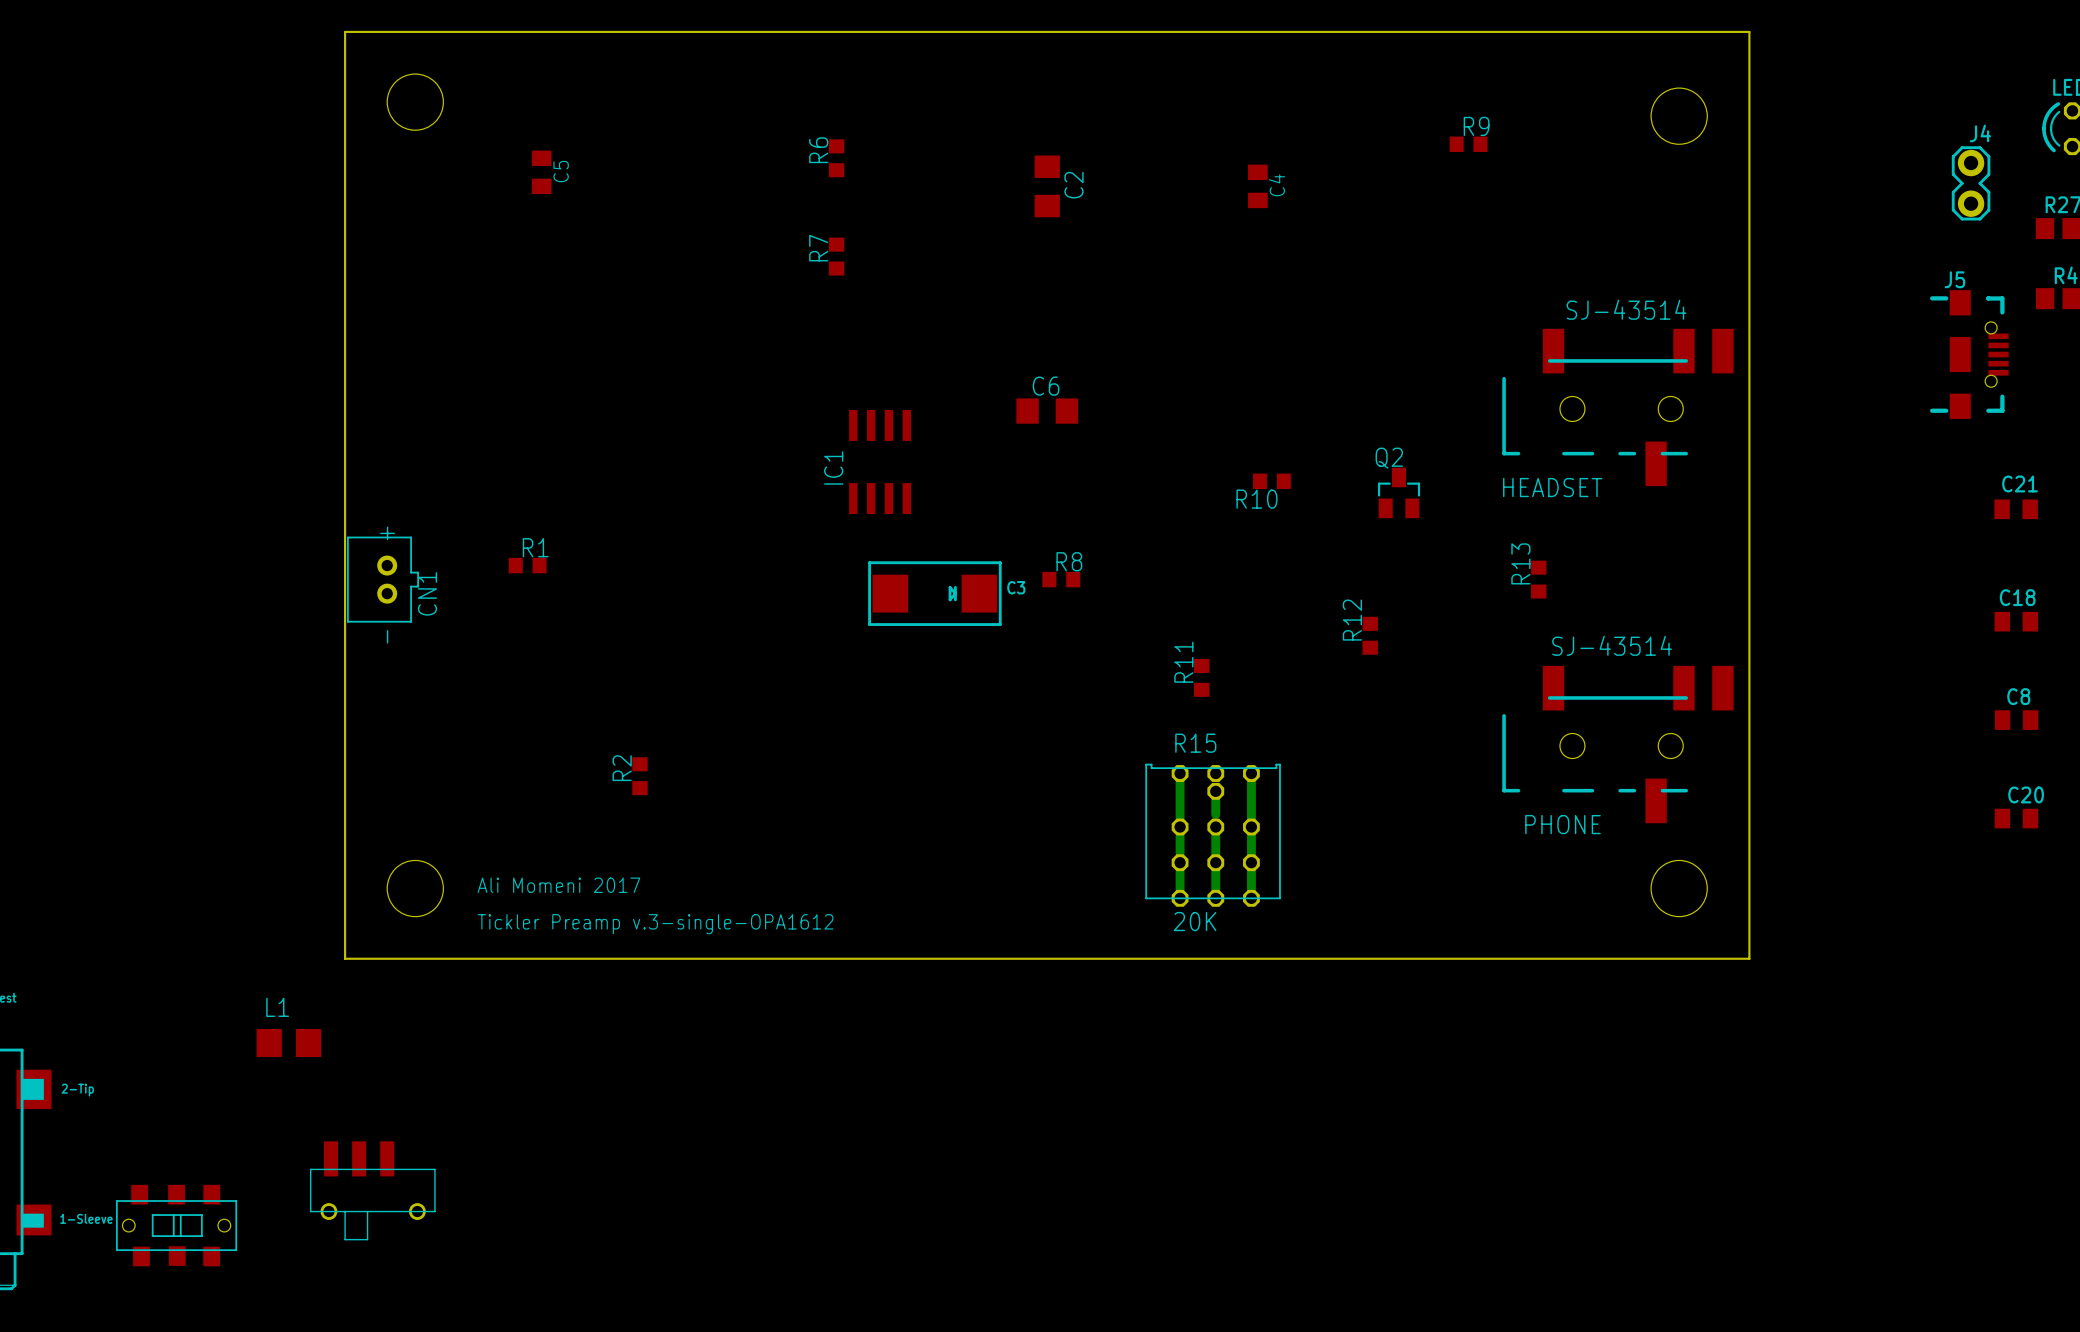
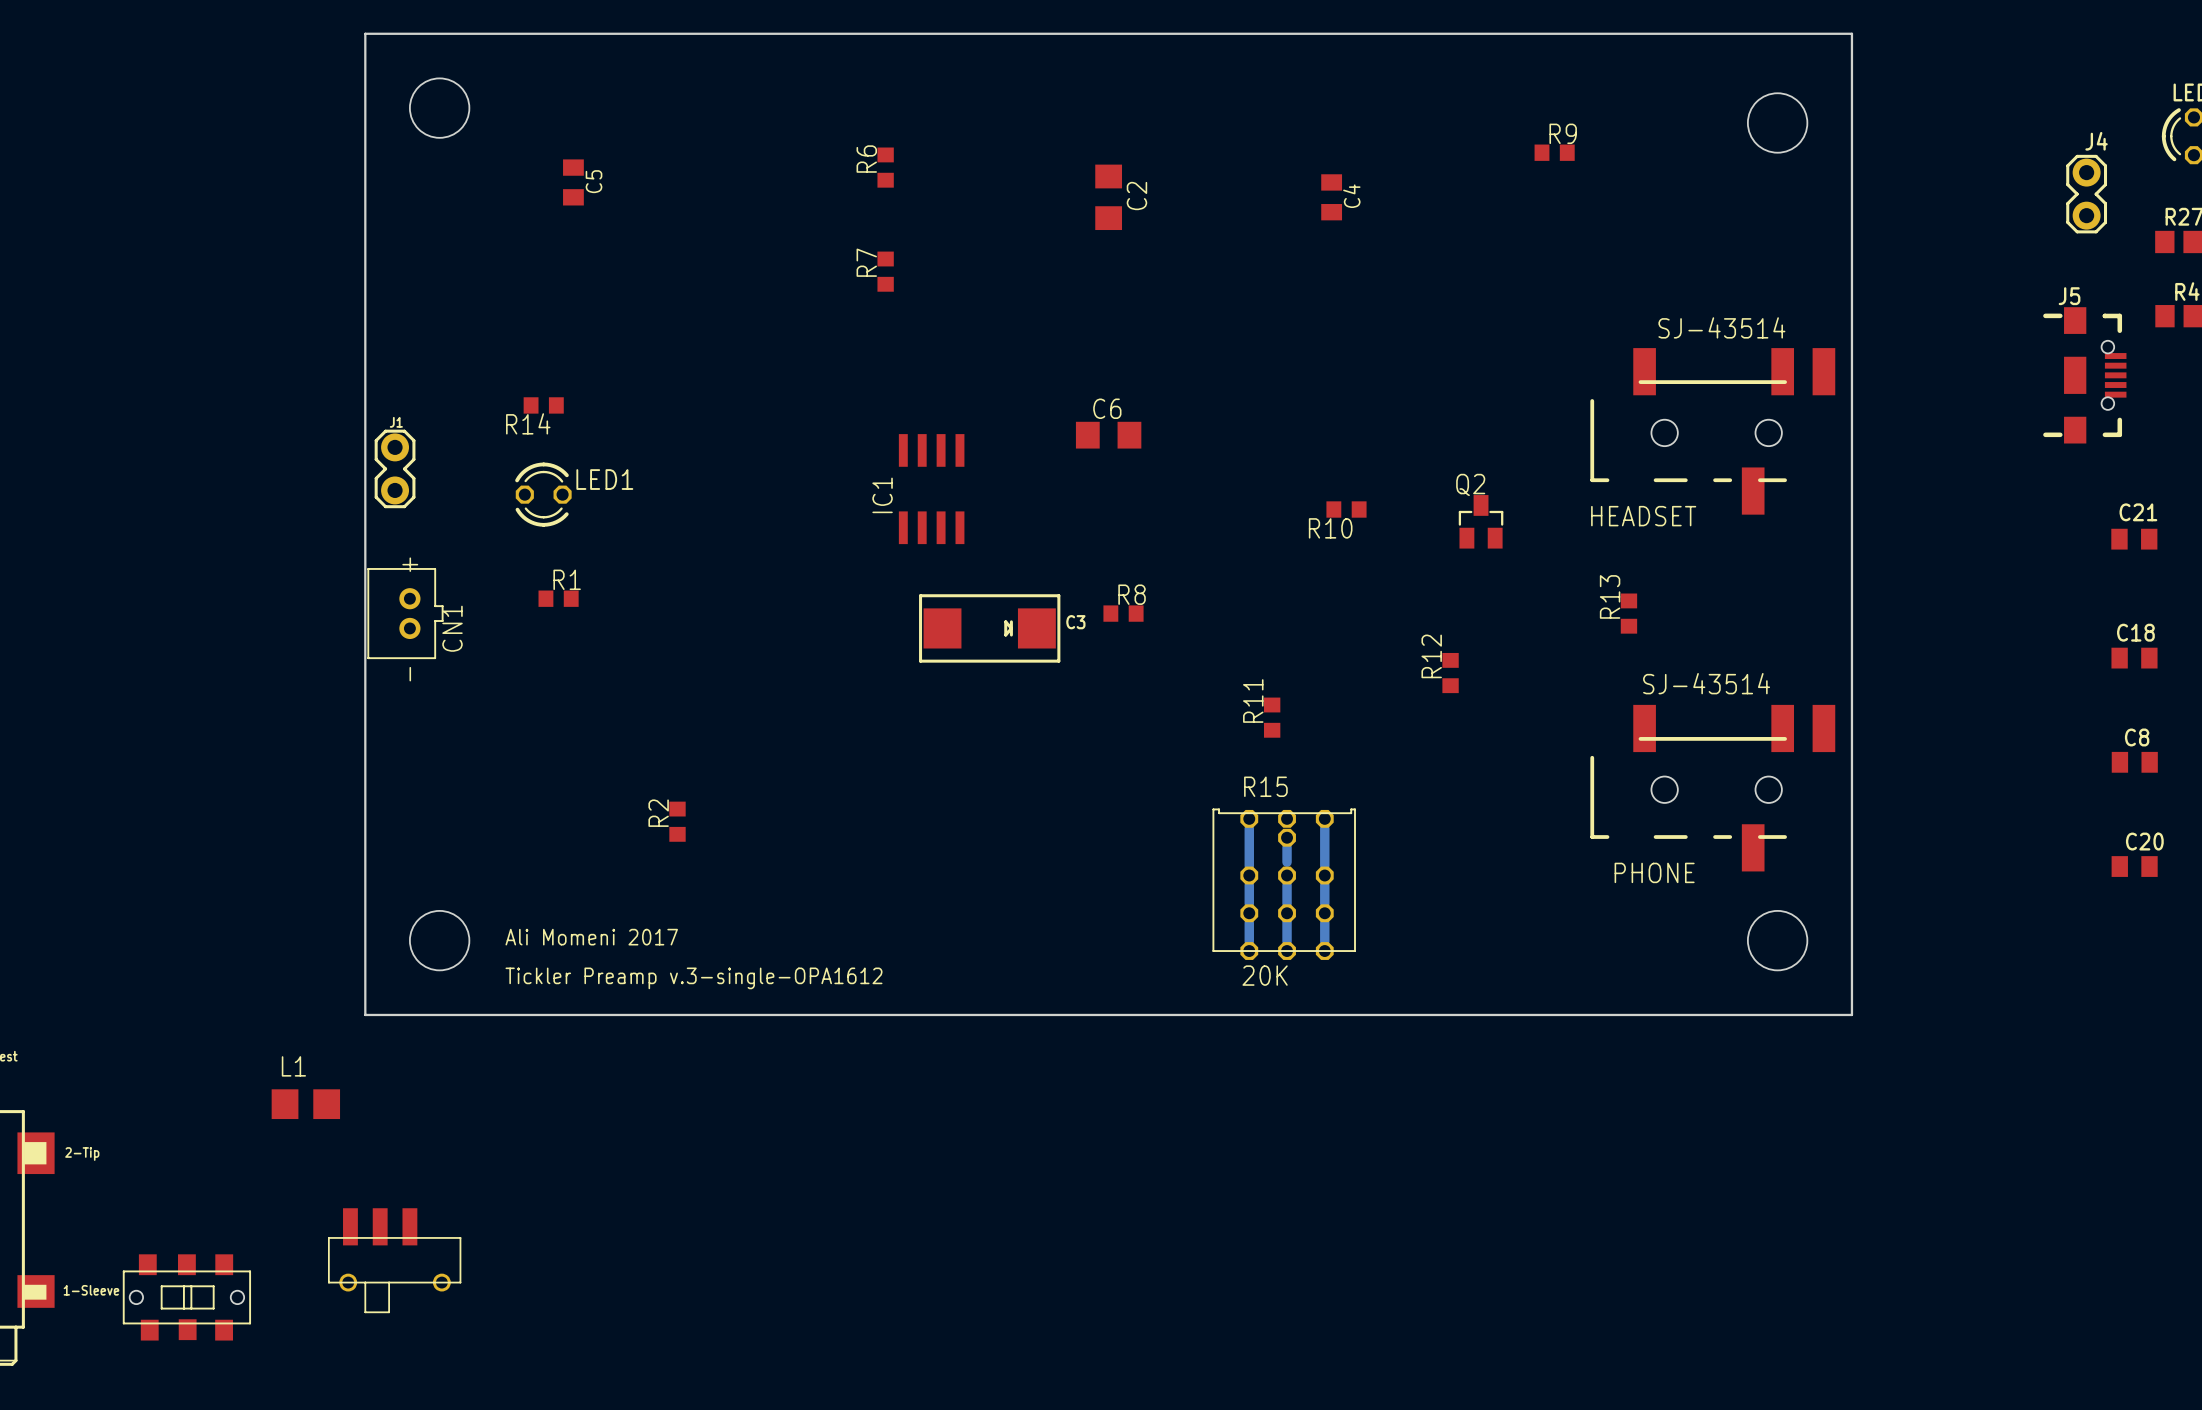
R14: none -> (543, 405)
J1: none -> (395, 468)
LED1: none -> (543, 494)

